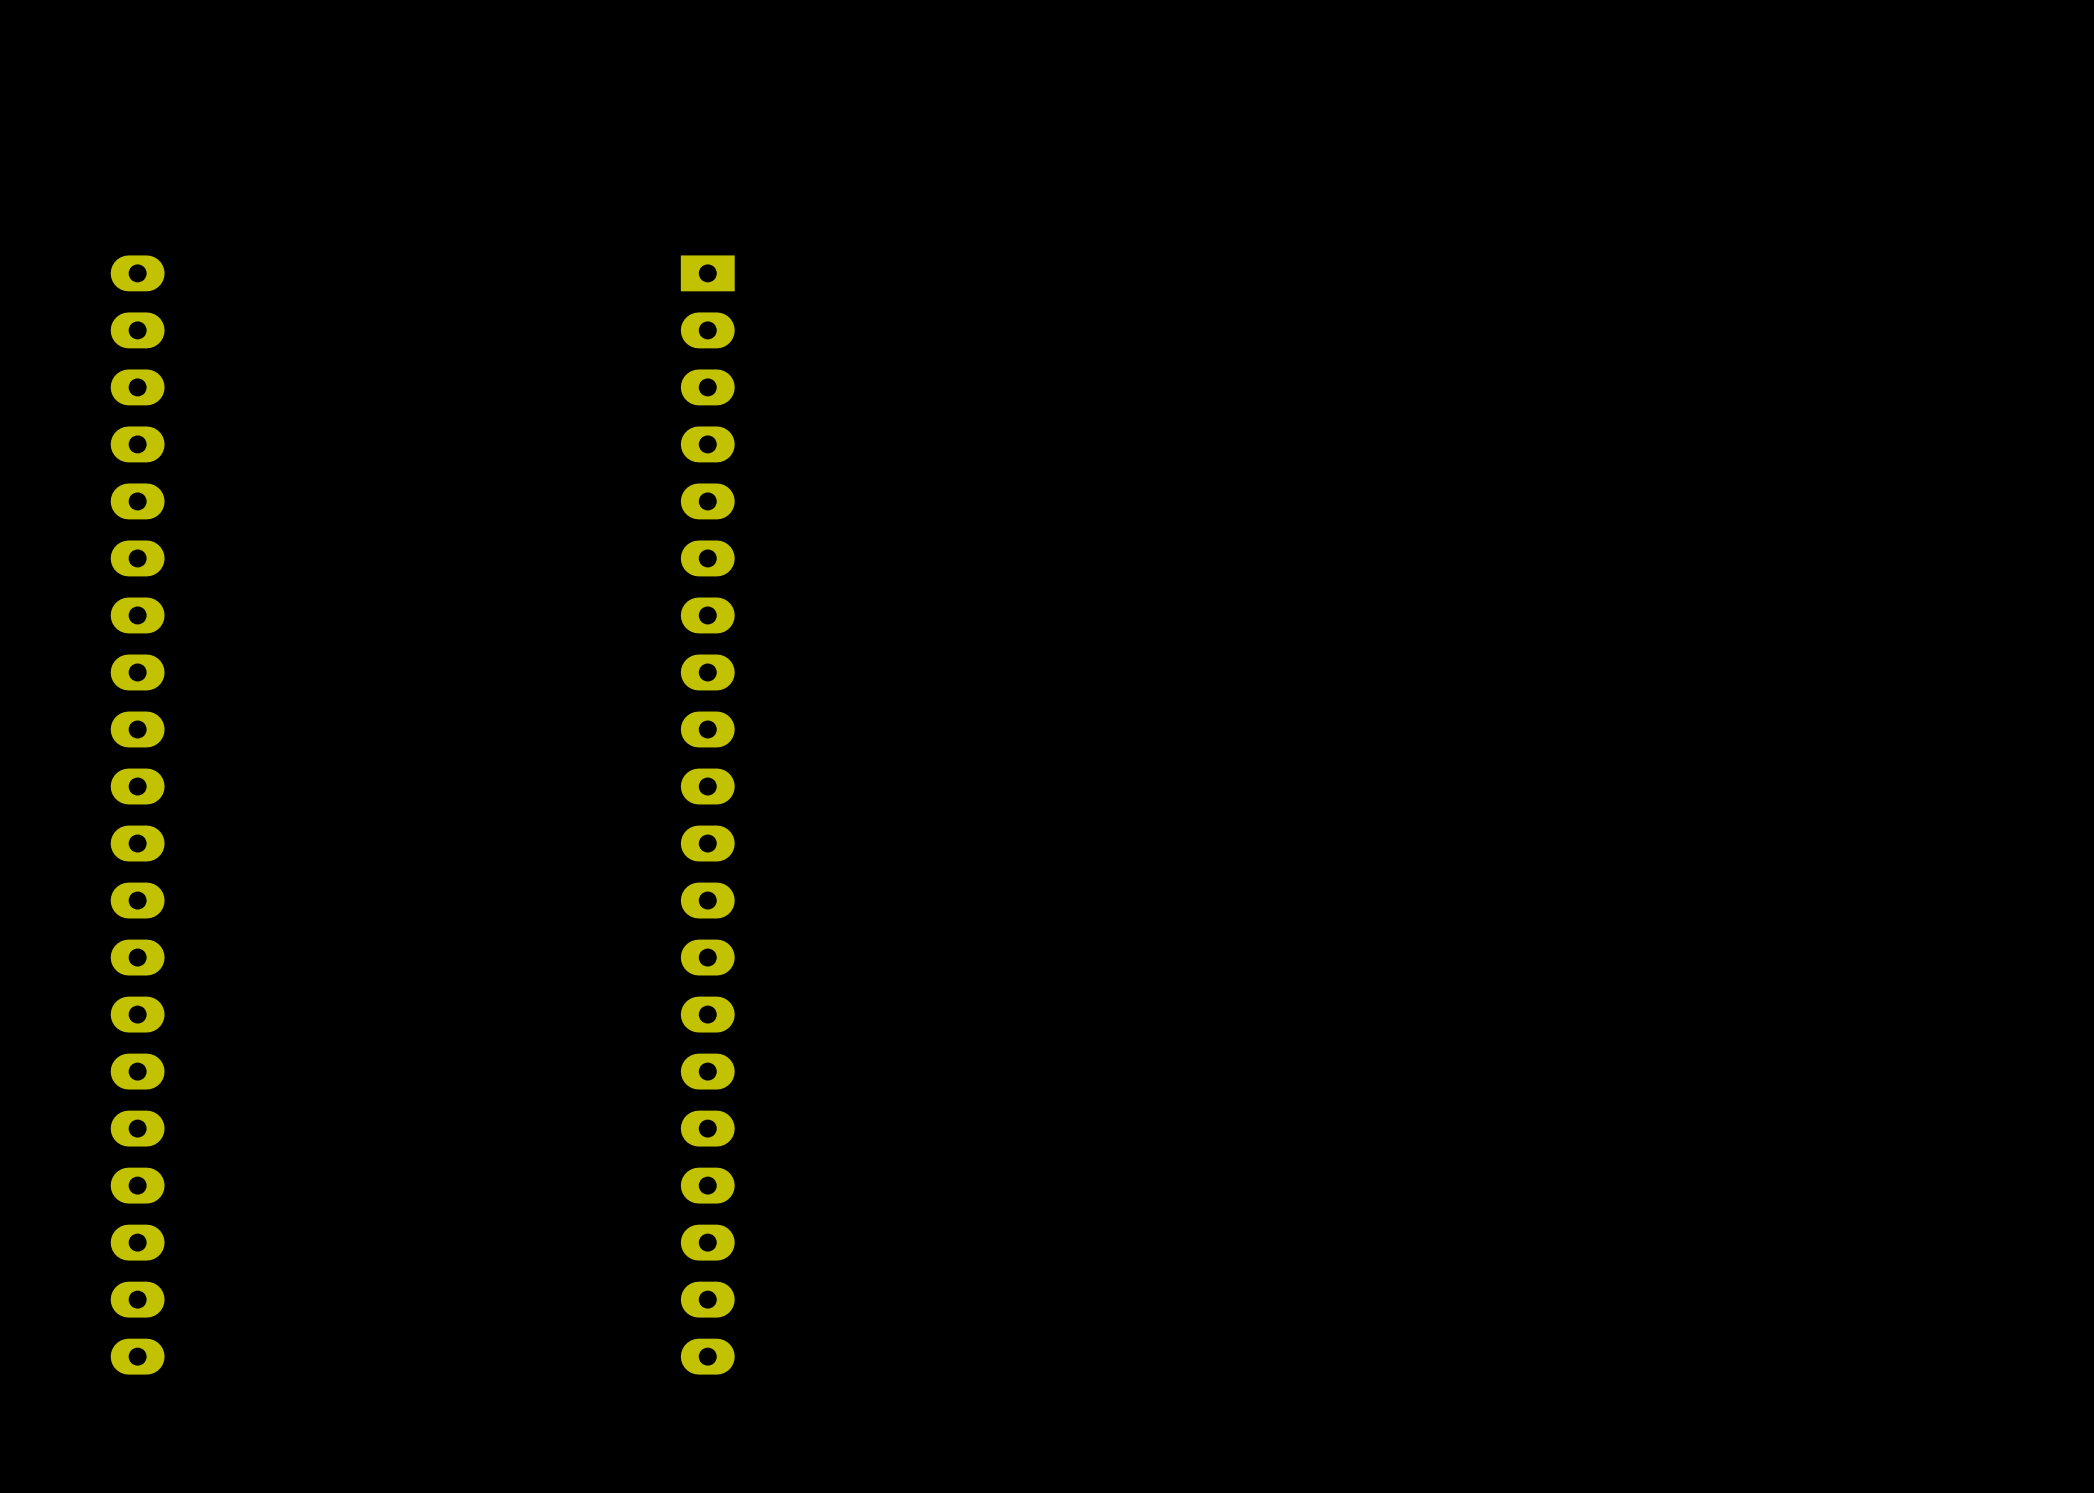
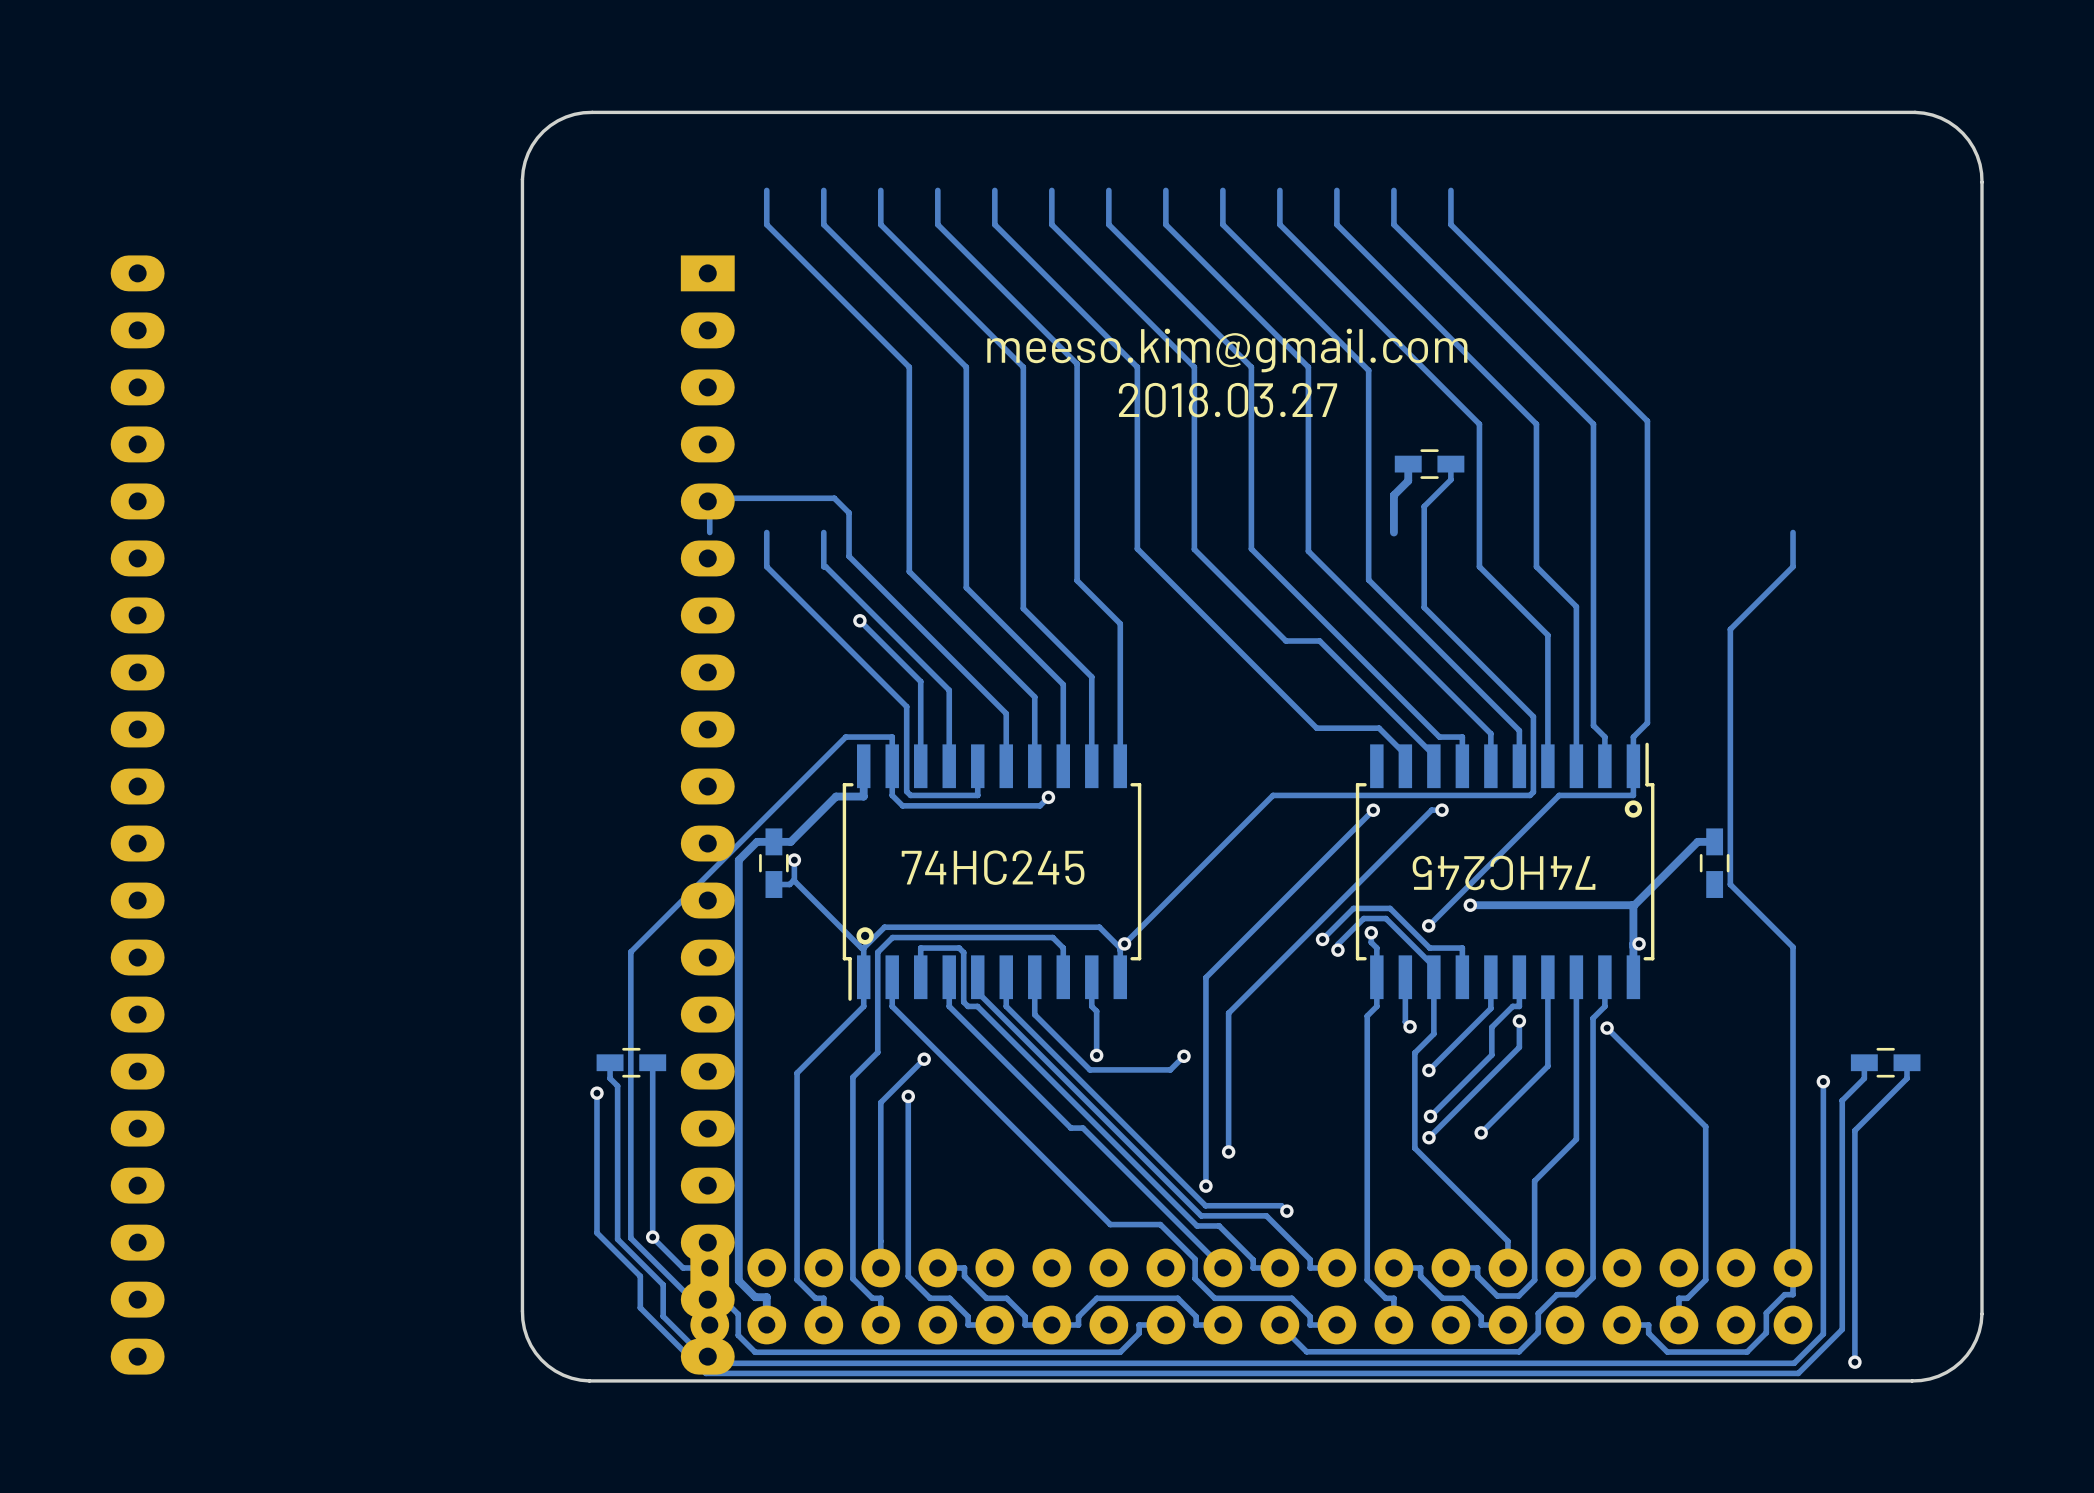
board edge: none -> (1915, 112) (592, 112) (566, 117) (543, 131) (528, 153) (522, 179) (522, 1311) (527, 1337) (541, 1359) (563, 1375) (589, 1380) (1912, 1380) (1938, 1376) (1960, 1361) (1976, 1340) (1981, 1313) (1981, 182) (1977, 155) (1962, 133) (1941, 118) (1915, 112)
track: none -> (766, 190) (766, 224) (909, 367) (909, 571) (1034, 697) (1034, 766)
track: none -> (823, 190) (823, 224) (966, 367) (966, 587) (1063, 684) (1063, 766)
track: none -> (880, 190) (880, 224) (1023, 367) (1023, 608) (1091, 676) (1091, 766)
track: none -> (937, 190) (937, 224) (1077, 363) (1077, 580) (1120, 623) (1120, 766)
track: none -> (994, 190) (994, 224) (1137, 367) (1137, 548) (1316, 728) (1379, 728) (1405, 754) (1405, 766)
track: none -> (1051, 190) (1051, 224) (1194, 367) (1194, 549) (1285, 641) (1319, 641) (1433, 755) (1433, 766)
track: none -> (1108, 190) (1108, 224) (1251, 367) (1251, 548) (1439, 737) (1462, 737) (1462, 766)
track: none -> (1165, 190) (1165, 224) (1308, 367) (1308, 551) (1490, 733) (1490, 766)
track: none -> (1222, 190) (1222, 224) (1368, 370) (1368, 579) (1519, 730) (1519, 766)
track: none -> (1279, 190) (1279, 224) (1479, 424) (1479, 566) (1547, 635) (1547, 766)
track: none -> (1336, 190) (1336, 224) (1536, 424) (1536, 566) (1576, 606) (1576, 766)
track: none -> (1393, 190) (1393, 224) (1593, 424) (1593, 725) (1604, 737) (1604, 766)
track: none -> (1450, 190) (1450, 224) (1647, 421) (1647, 723) (1633, 737) (1633, 795) (1559, 795) (1428, 925)
text: none -> meeso.kim@gmail.com (1227, 350)
text: none -> 2018.03.27 (1228, 400)
track: none -> (1408, 464) (1408, 480) (1393, 495) (1393, 532)
part: none -> (1429, 464)
track: none -> (1450, 464) (1450, 479) (1424, 506) (1424, 607) (1533, 716) (1533, 792) (1530, 795) (1273, 795) (1120, 948)
track: none -> (709, 532) (709, 498) (834, 498) (849, 512) (849, 556) (1006, 713) (1006, 766)
track: none -> (766, 532) (766, 566) (906, 706) (906, 791) (910, 795) (977, 795) (977, 766)
track: none -> (823, 532) (823, 566) (949, 690) (949, 766)
track: none -> (1793, 532) (1793, 566) (1730, 629) (1730, 884) (1793, 947) (1793, 1294) (1784, 1294) (1766, 1313) (1766, 1332) (1747, 1352) (1667, 1352) (1648, 1333) (1648, 1325) (1621, 1325)
track: none -> (859, 620) (920, 681) (920, 766)
via: none -> (859, 620)
track: none -> (863, 766) (863, 796) (836, 796) (790, 841) (757, 841) (738, 860) (738, 1280) (755, 1297) (766, 1297) (766, 1325)
track: none -> (1048, 797) (1040, 805) (902, 805) (892, 795) (892, 737) (845, 737) (630, 952) (630, 1238) (690, 1297) (721, 1297) (738, 1314) (738, 1335) (755, 1352) (1120, 1352) (1139, 1333) (1139, 1325) (1165, 1325)
via: none -> (1048, 797)
drawing: none -> [1624, 800, 1643, 818]
track: none -> (1373, 810) (1205, 977) (1205, 1186)
via: none -> (1373, 810)
track: none -> (1442, 810) (1431, 810) (1228, 1013) (1228, 1151)
via: none -> (1442, 810)
track: none -> (1714, 841) (1697, 841) (1633, 906)
track: none -> (794, 860) (794, 880)
via: none -> (794, 860)
part: none -> (773, 863)
part: none -> (1714, 863)
text: none -> 74HC245 (993, 867)
part: none -> (1505, 870)
part: none -> (992, 872)
text: none -> 74HC245 (1504, 872)
track: none -> (794, 880) (789, 884) (773, 884)
track: none -> (794, 880) (861, 948) (863, 948)
track: none -> (1470, 905) (1633, 906)
via: none -> (1470, 905)
track: none -> (1633, 906) (1633, 977)
via: none -> (1428, 925)
drawing: none -> [856, 927, 874, 945]
track: none -> (1371, 932) (1371, 942) (1376, 948) (1376, 1006) (1367, 1016) (1367, 1279) (1385, 1298) (1393, 1298) (1393, 1325)
via: none -> (1371, 932)
track: none -> (1322, 939) (1353, 908) (1390, 908) (1429, 948) (1462, 948) (1462, 977)
via: none -> (1322, 939)
via: none -> (1124, 943)
via: none -> (1639, 943)
track: none -> (863, 948) (863, 1006) (797, 1073) (797, 1279) (815, 1298) (823, 1298) (823, 1325)
track: none -> (863, 948) (884, 927) (1099, 927) (1120, 948) (1120, 977)
track: none -> (1337, 950) (1337, 944) (1363, 918) (1385, 918) (1433, 966) (1433, 1033) (1414, 1052) (1414, 1148) (1507, 1241) (1507, 1267)
via: none -> (1337, 950)
track: none -> (892, 977) (892, 1006) (1110, 1224) (1160, 1224) (1195, 1259) (1195, 1278) (1214, 1298) (1291, 1298) (1310, 1316) (1310, 1325) (1336, 1325)
track: none -> (920, 977) (920, 948) (959, 948) (963, 952) (963, 1002) (967, 1006) (977, 1006) (1197, 1225) (1219, 1225) (1253, 1259) (1253, 1267) (1279, 1267)
track: none -> (949, 977) (949, 1006) (1070, 1128) (1082, 1128) (1222, 1267)
track: none -> (977, 977) (977, 992) (1201, 1215) (1266, 1215) (1310, 1259) (1310, 1267) (1336, 1267)
track: none -> (1006, 977) (1006, 1006) (1205, 1205) (1281, 1205) (1286, 1211)
track: none -> (1034, 977) (1034, 1014) (1089, 1069) (1170, 1069) (1184, 1056)
track: none -> (1063, 977) (1063, 948) (1052, 937) (892, 937) (877, 952) (877, 1052) (852, 1077) (852, 1278) (872, 1298) (880, 1298) (880, 1325)
track: none -> (1091, 977) (1091, 1006) (1096, 1011) (1096, 1055)
track: none -> (1405, 977) (1405, 1022) (1410, 1026)
track: none -> (1490, 977) (1490, 1008) (1428, 1070)
track: none -> (1519, 977) (1519, 1006) (1512, 1006) (1491, 1027) (1491, 1055) (1430, 1116)
track: none -> (1547, 977) (1547, 1066) (1481, 1132)
track: none -> (1576, 977) (1576, 1139) (1534, 1181) (1534, 1280) (1518, 1295) (1497, 1295) (1477, 1276) (1477, 1267) (1450, 1267)
track: none -> (1604, 977) (1604, 1006) (1593, 1018) (1593, 1277) (1576, 1294) (1557, 1294) (1538, 1313) (1538, 1332) (1519, 1351) (1306, 1351) (1279, 1325)
track: none -> (1519, 1021) (1519, 1047) (1429, 1137)
via: none -> (1519, 1021)
via: none -> (1410, 1026)
track: none -> (1607, 1028) (1705, 1126) (1705, 1279) (1687, 1298) (1678, 1298) (1678, 1325)
via: none -> (1607, 1028)
via: none -> (1096, 1055)
via: none -> (1184, 1056)
track: none -> (924, 1059) (880, 1102) (880, 1267)
via: none -> (924, 1059)
track: none -> (610, 1062) (610, 1078) (617, 1086) (617, 1239) (663, 1284) (663, 1316) (710, 1363) (1794, 1363) (1823, 1334) (1823, 1081)
part: none -> (631, 1062)
track: none -> (652, 1062) (652, 1237) (683, 1267) (709, 1267)
track: none -> (1864, 1062) (1864, 1078) (1842, 1100) (1842, 1329) (1798, 1373) (705, 1373) (640, 1307) (640, 1276) (596, 1232) (596, 1093)
part: none -> (1885, 1062)
track: none -> (1907, 1062) (1907, 1078) (1854, 1130) (1854, 1362)
via: none -> (1428, 1070)
via: none -> (1823, 1081)
via: none -> (596, 1093)
track: none -> (908, 1096) (908, 1276) (930, 1298) (949, 1298) (968, 1316) (968, 1325) (994, 1325)
via: none -> (908, 1096)
via: none -> (1430, 1116)
via: none -> (1481, 1132)
via: none -> (1429, 1137)
via: none -> (1228, 1151)
via: none -> (1205, 1186)
via: none -> (1286, 1211)
via: none -> (652, 1237)
track: none -> (937, 1267) (964, 1267) (964, 1276) (986, 1298) (1006, 1298) (1025, 1316) (1025, 1325) (1078, 1325) (1078, 1316) (1096, 1298) (1177, 1298) (1196, 1316) (1196, 1325) (1222, 1325)
track: none -> (1393, 1267) (1420, 1267) (1420, 1276) (1442, 1298) (1462, 1298) (1481, 1316) (1481, 1325) (1507, 1325)
part: none -> (1251, 1296)
via: none -> (1854, 1362)

